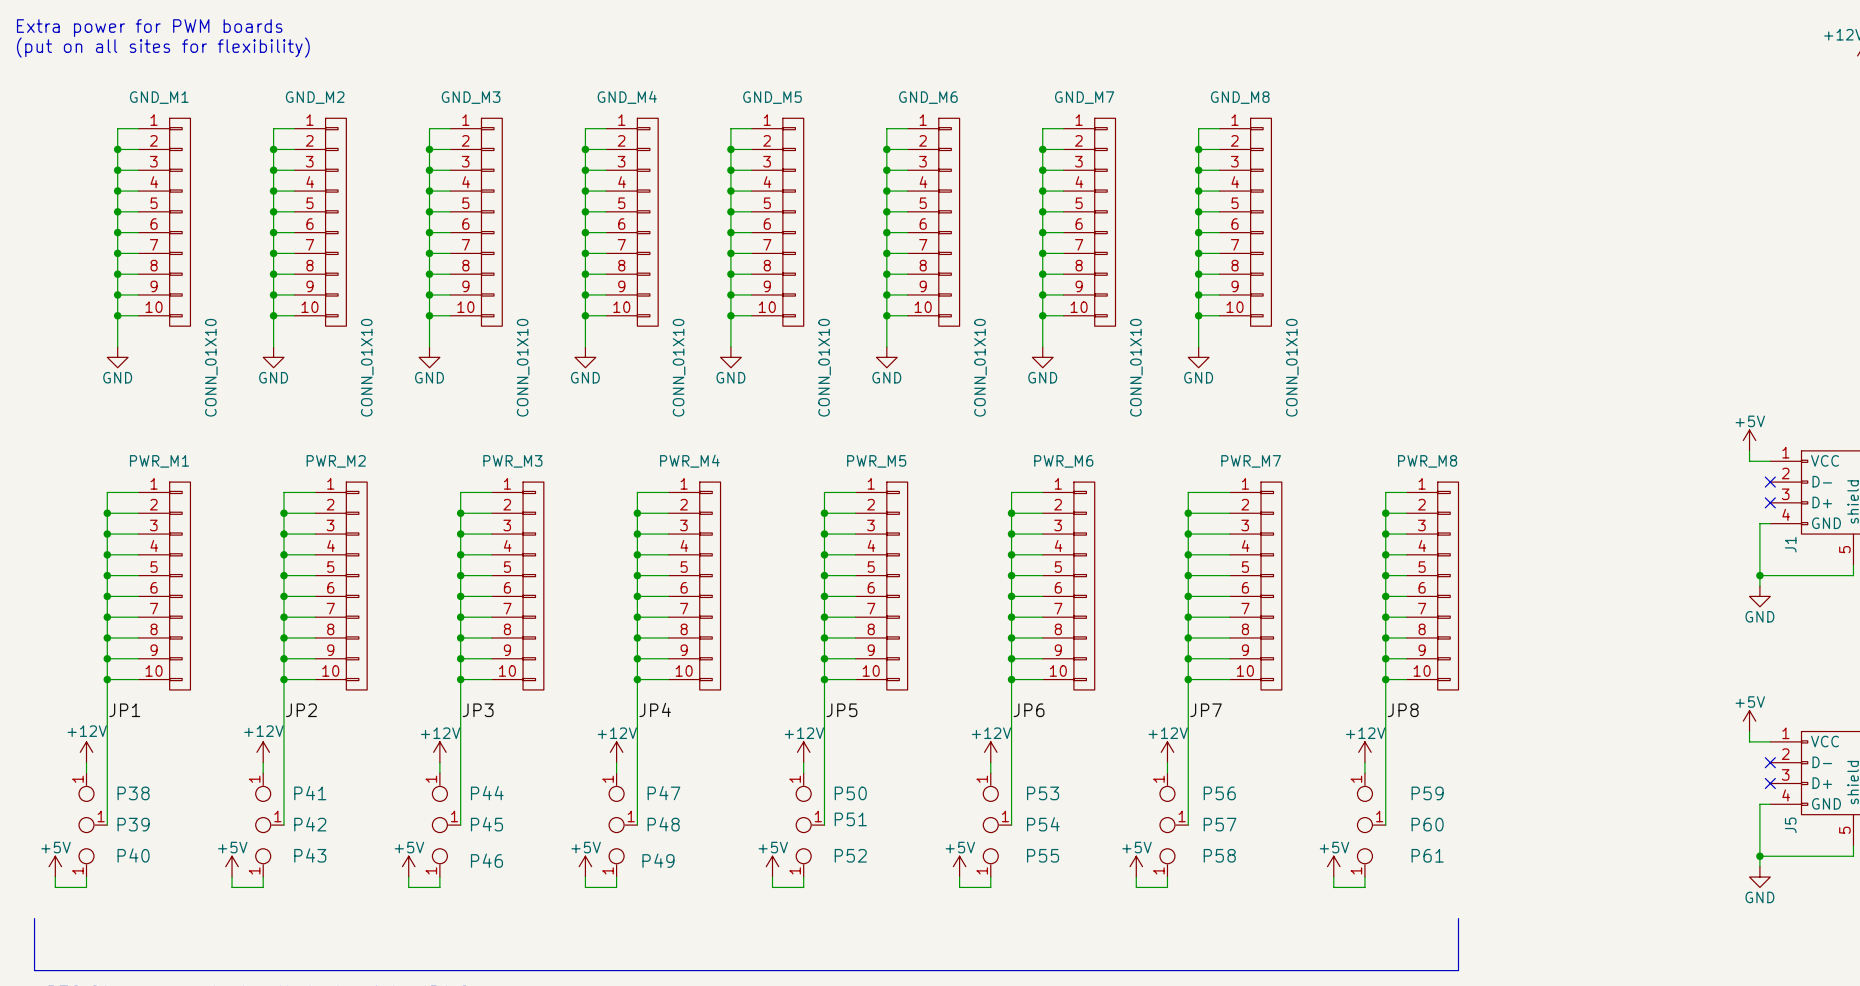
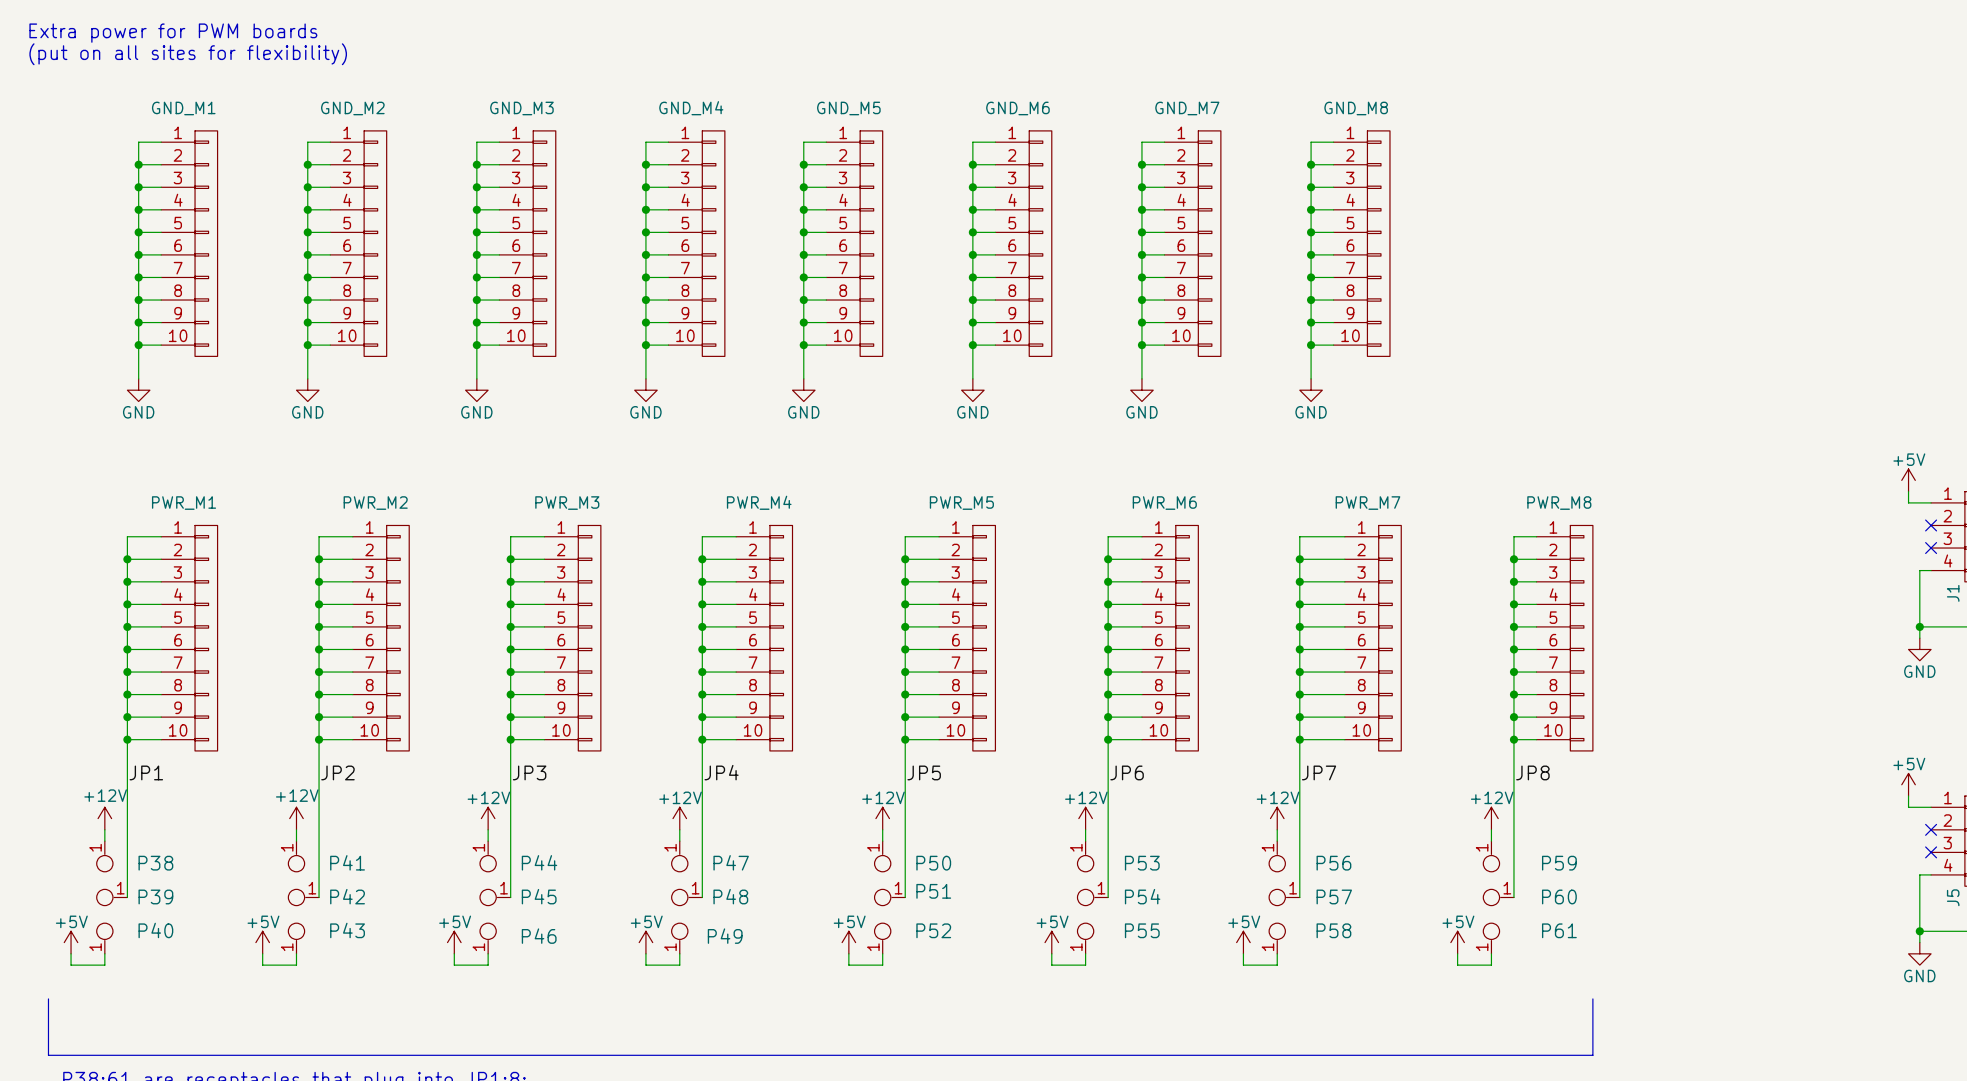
GND_M1 value: CONN_01X10 (211, 367) -> none
GND_M2 value: CONN_01X10 (367, 367) -> none
GND_M3 value: CONN_01X10 (523, 367) -> none
GND_M4 value: CONN_01X10 (679, 367) -> none
GND_M5 value: CONN_01X10 (824, 367) -> none
GND_M6 value: CONN_01X10 (980, 367) -> none
GND_M7 value: CONN_01X10 (1136, 367) -> none
GND_M8 value: CONN_01X10 (1292, 367) -> none

